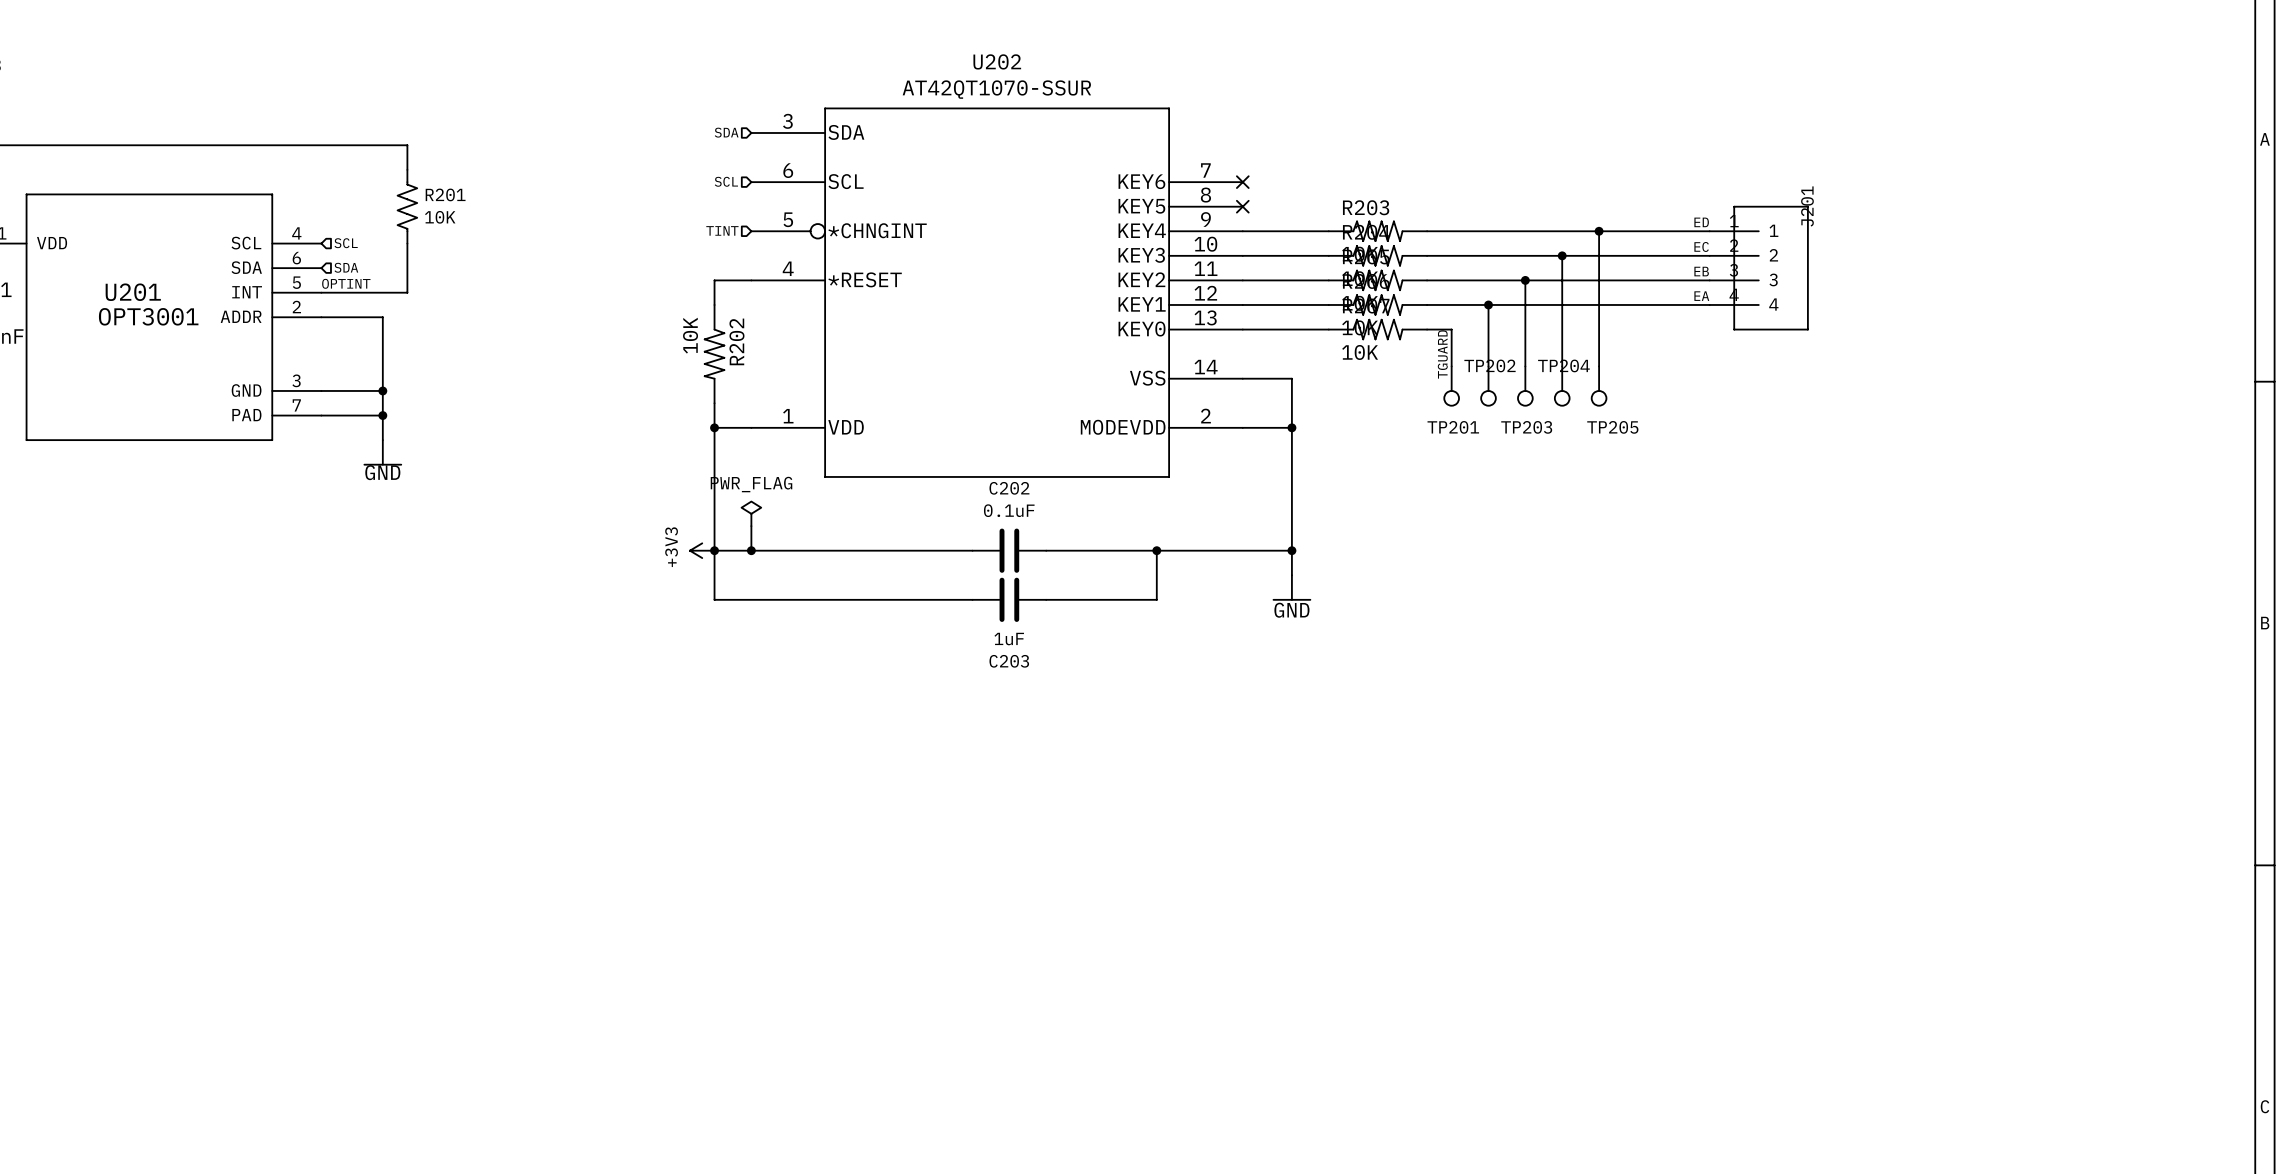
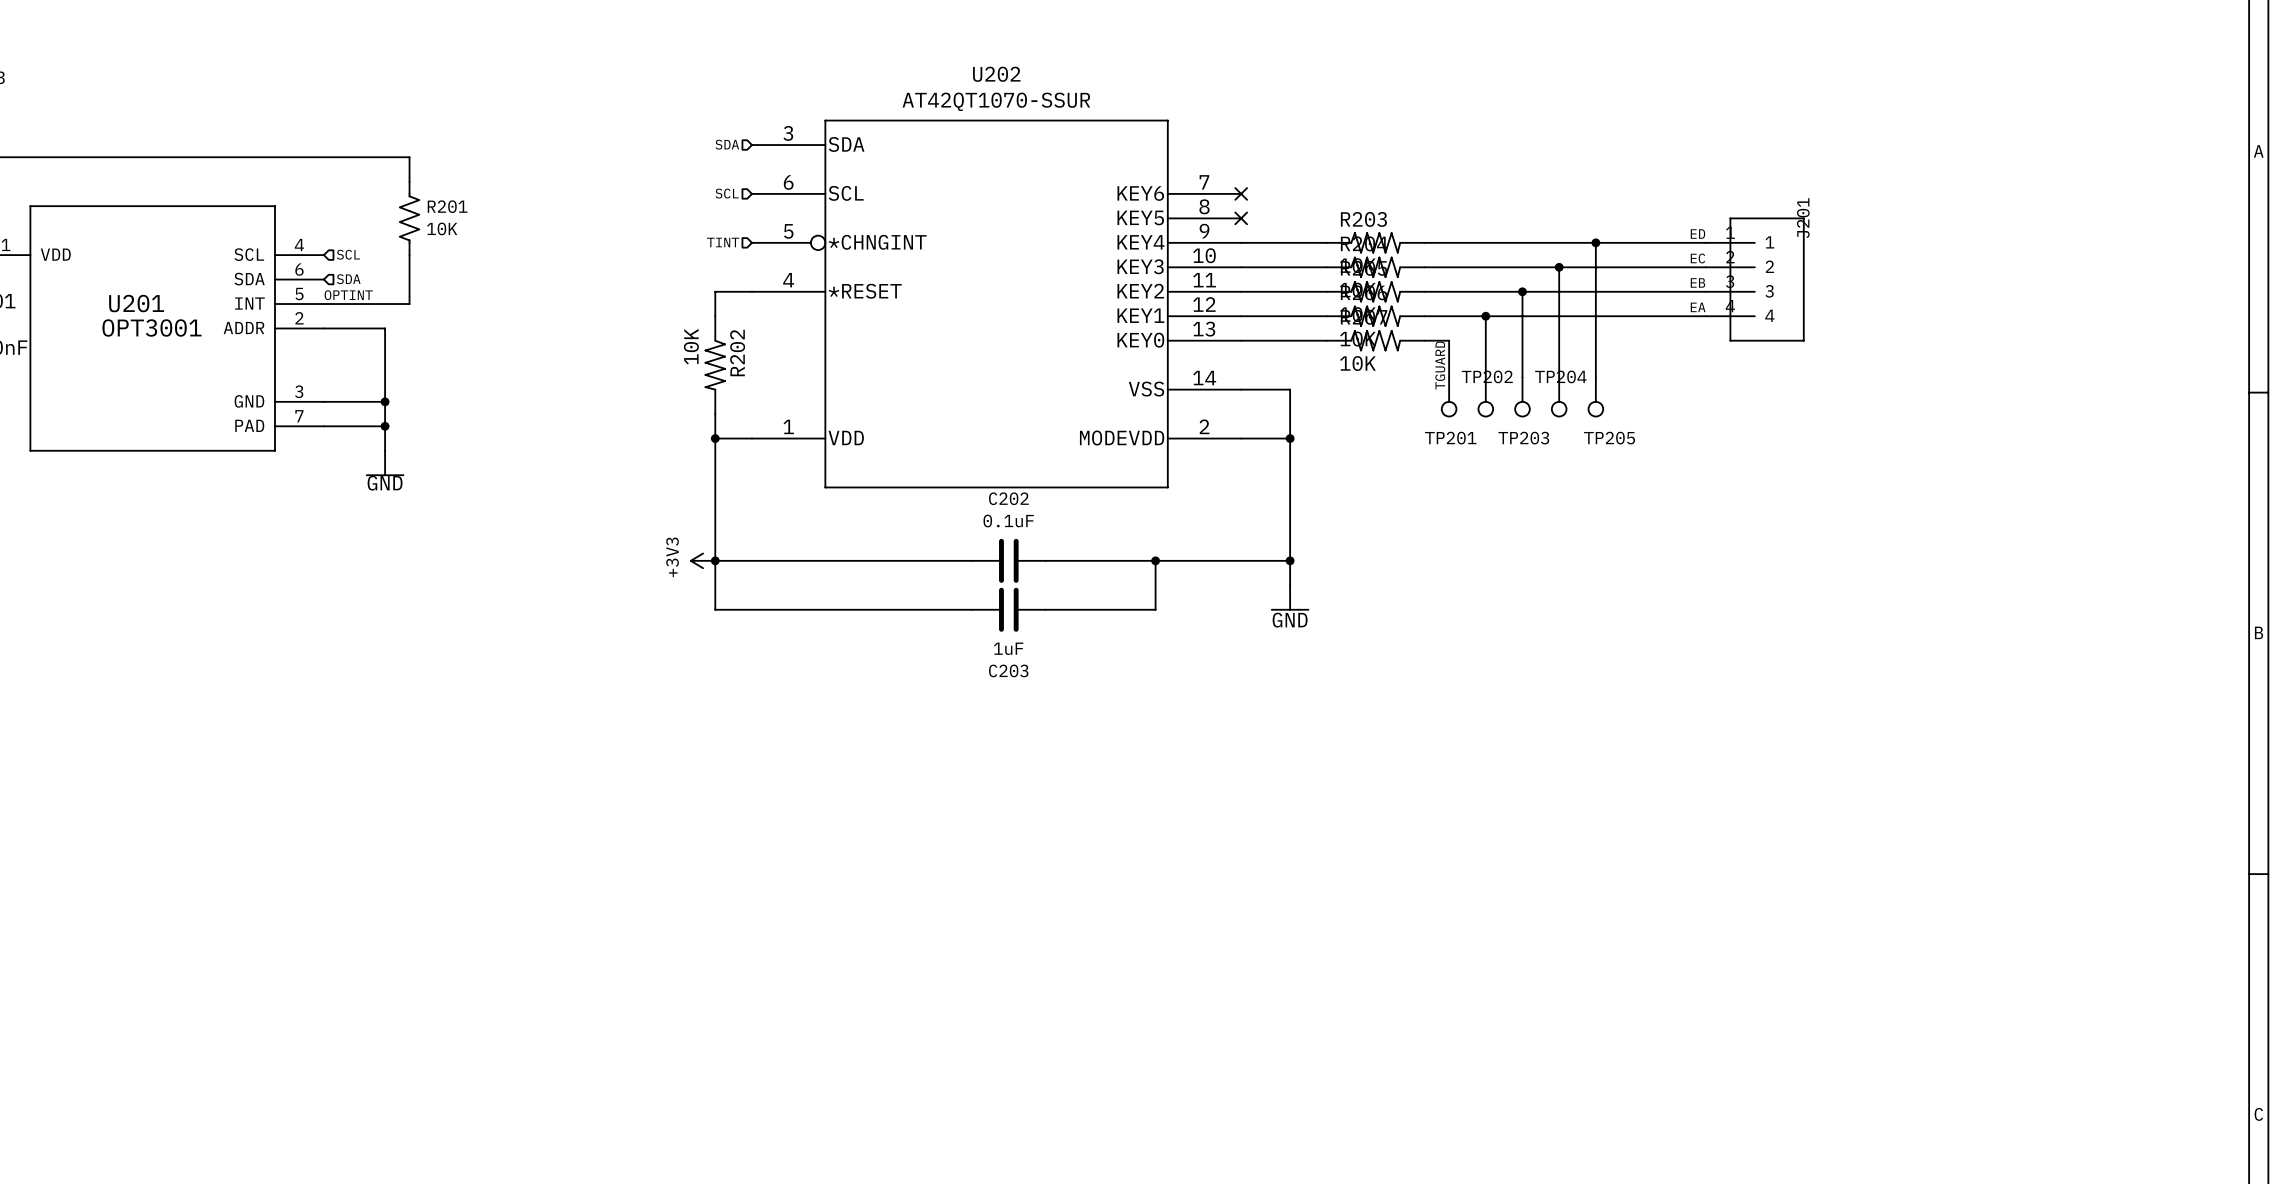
power symbol: PWR_FLAG (751, 513) -> none
wire: (751, 526) (751, 550) -> none
junction: (751, 550) -> none

